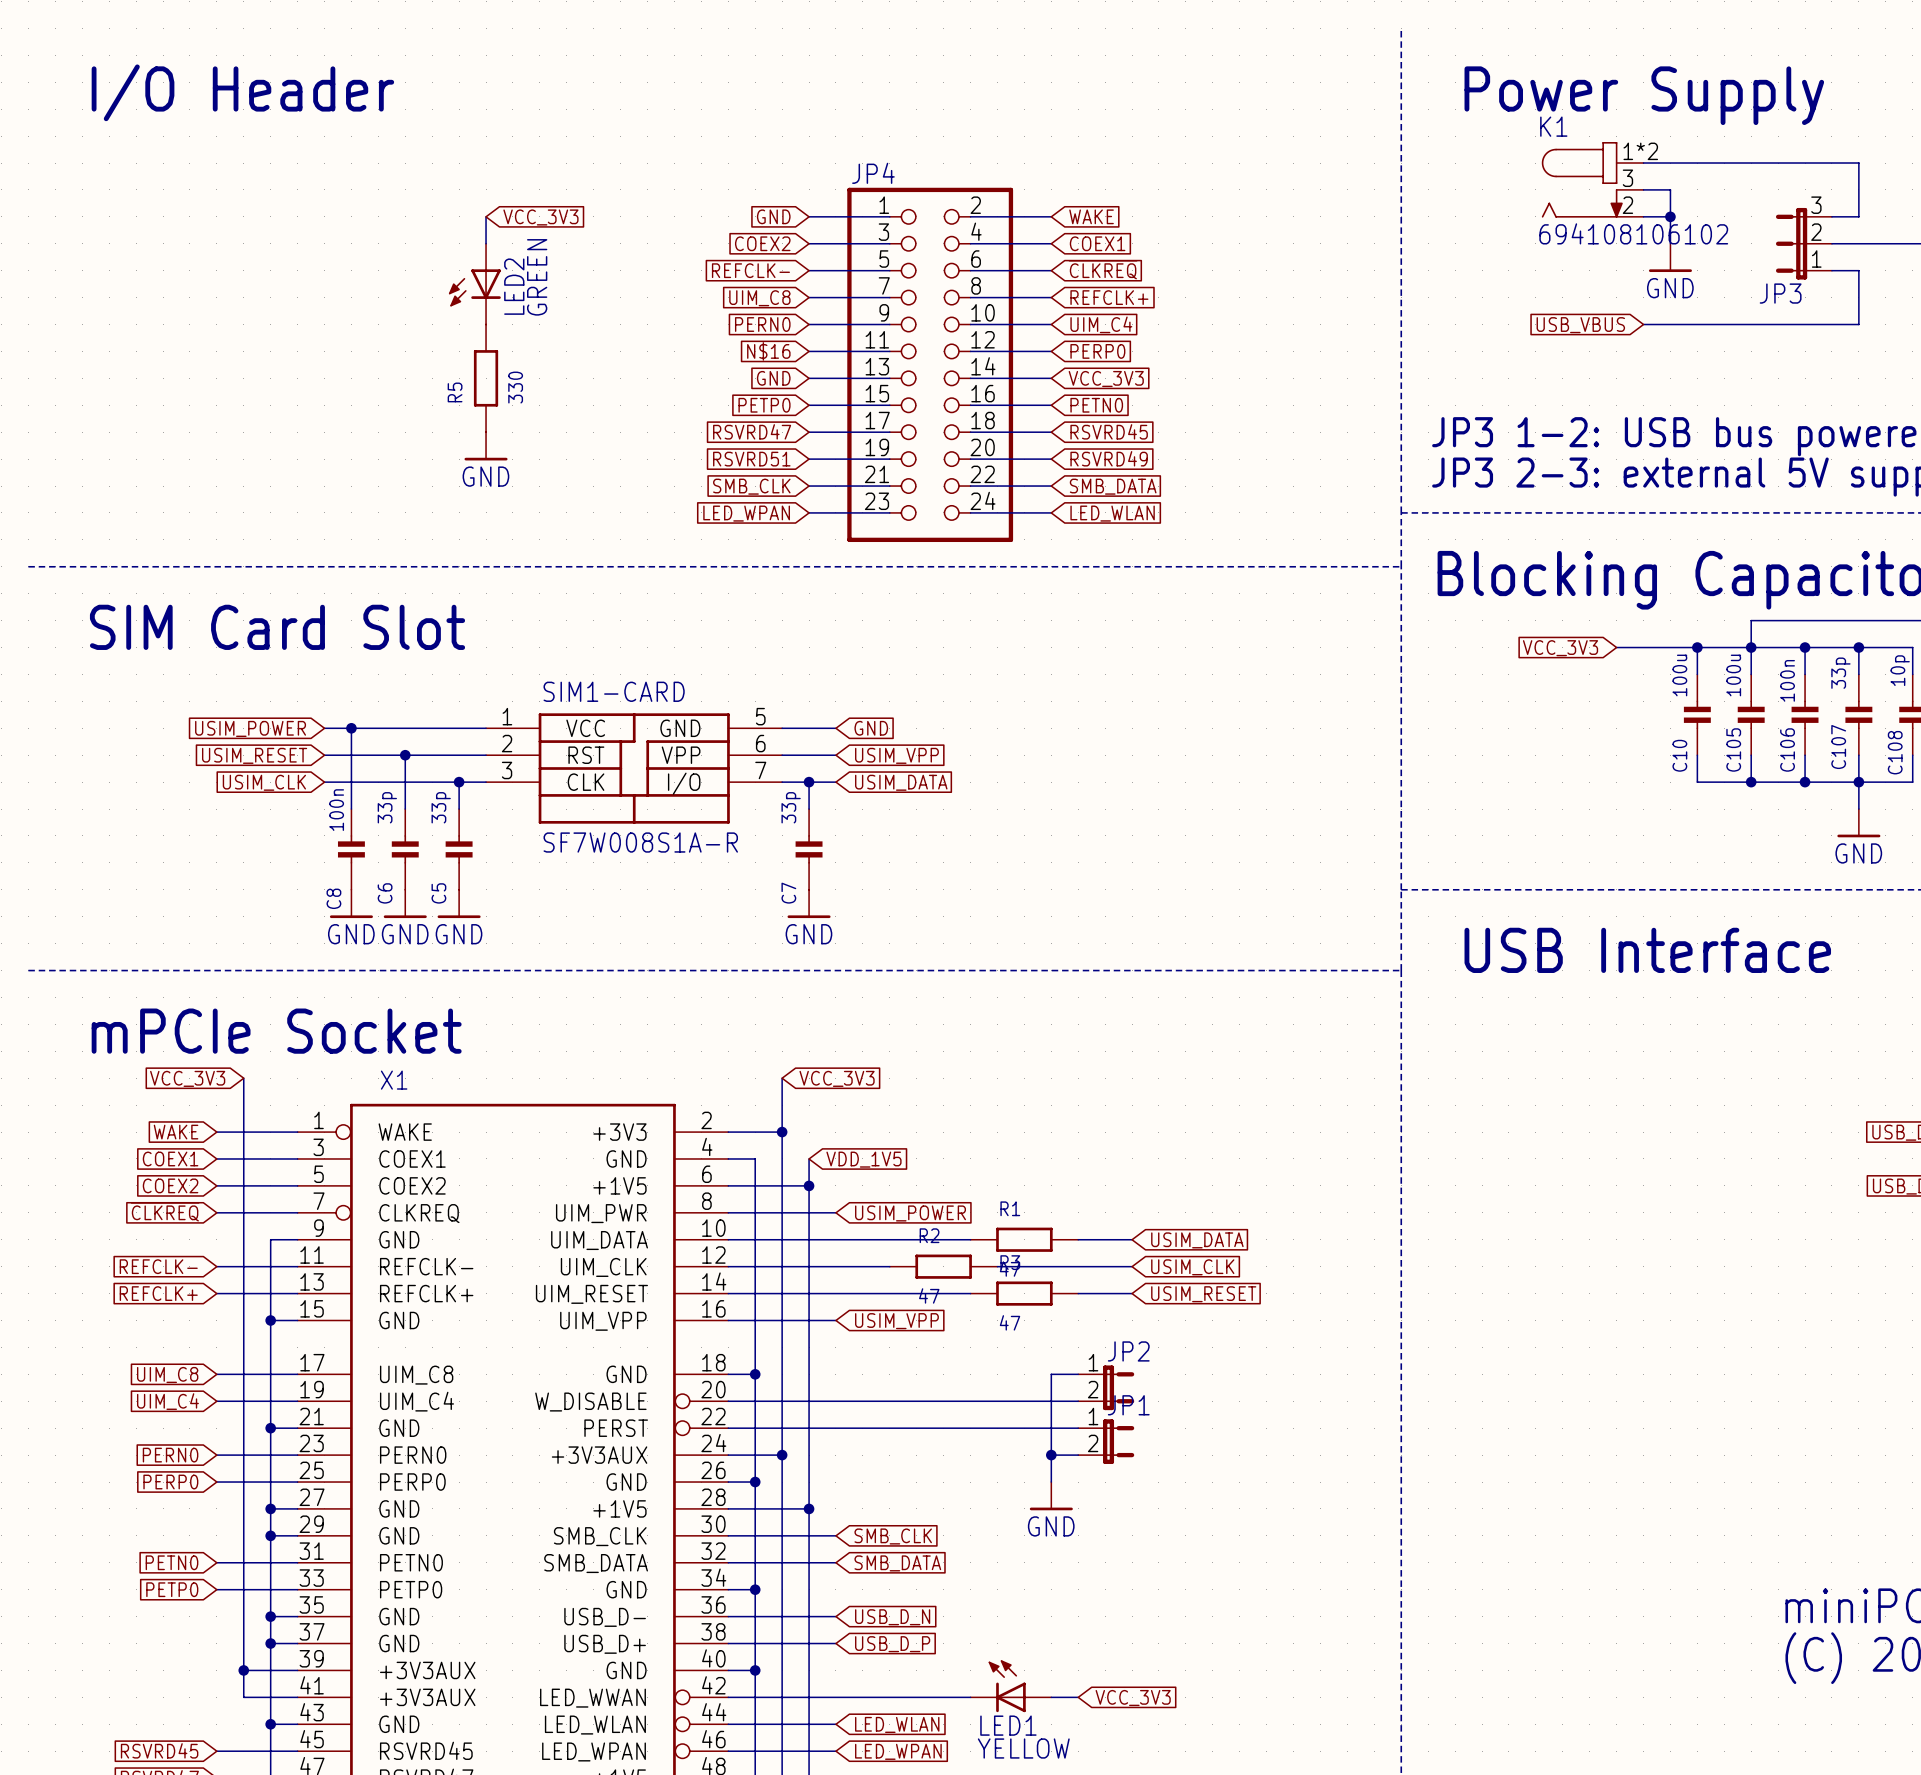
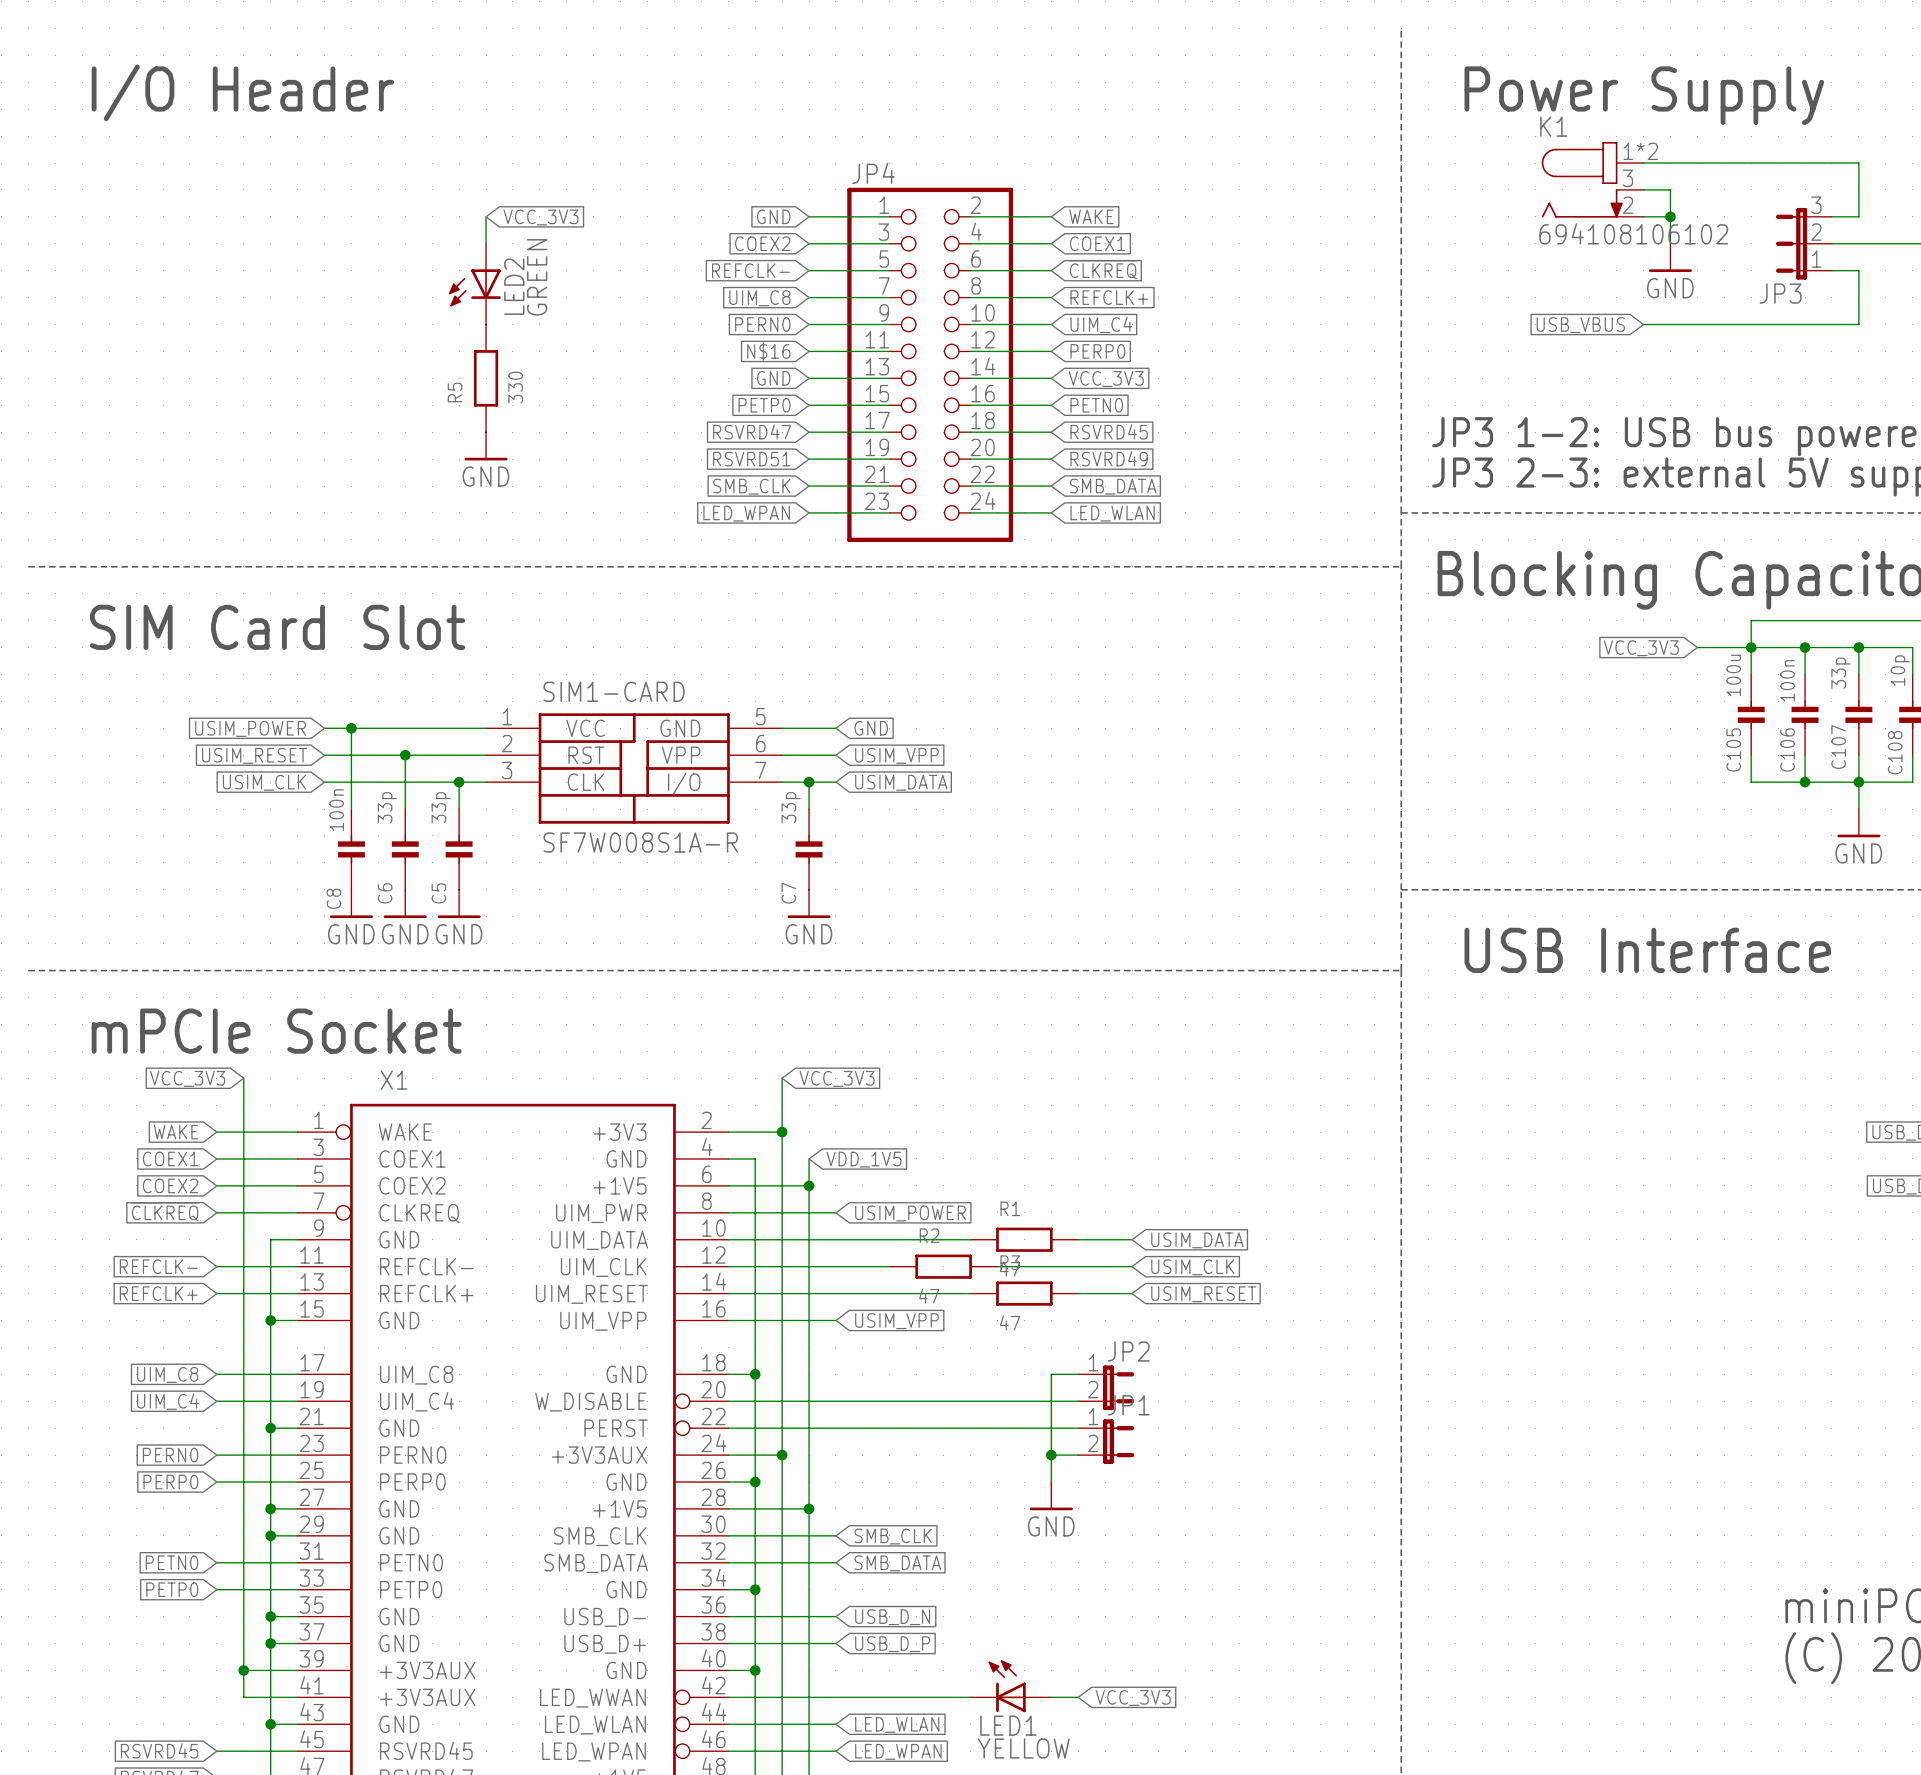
wire: (1616, 647) (1697, 647) (1697, 674) -> none
junction: (1697, 647) -> none
global label position: VCC_3V3 (1560, 648) -> VCC_3V3 (1641, 648)
C10: 100u (1697, 714) -> none
wire: (1697, 755) (1697, 782) (1751, 782) -> none
junction: (1751, 782) -> none

